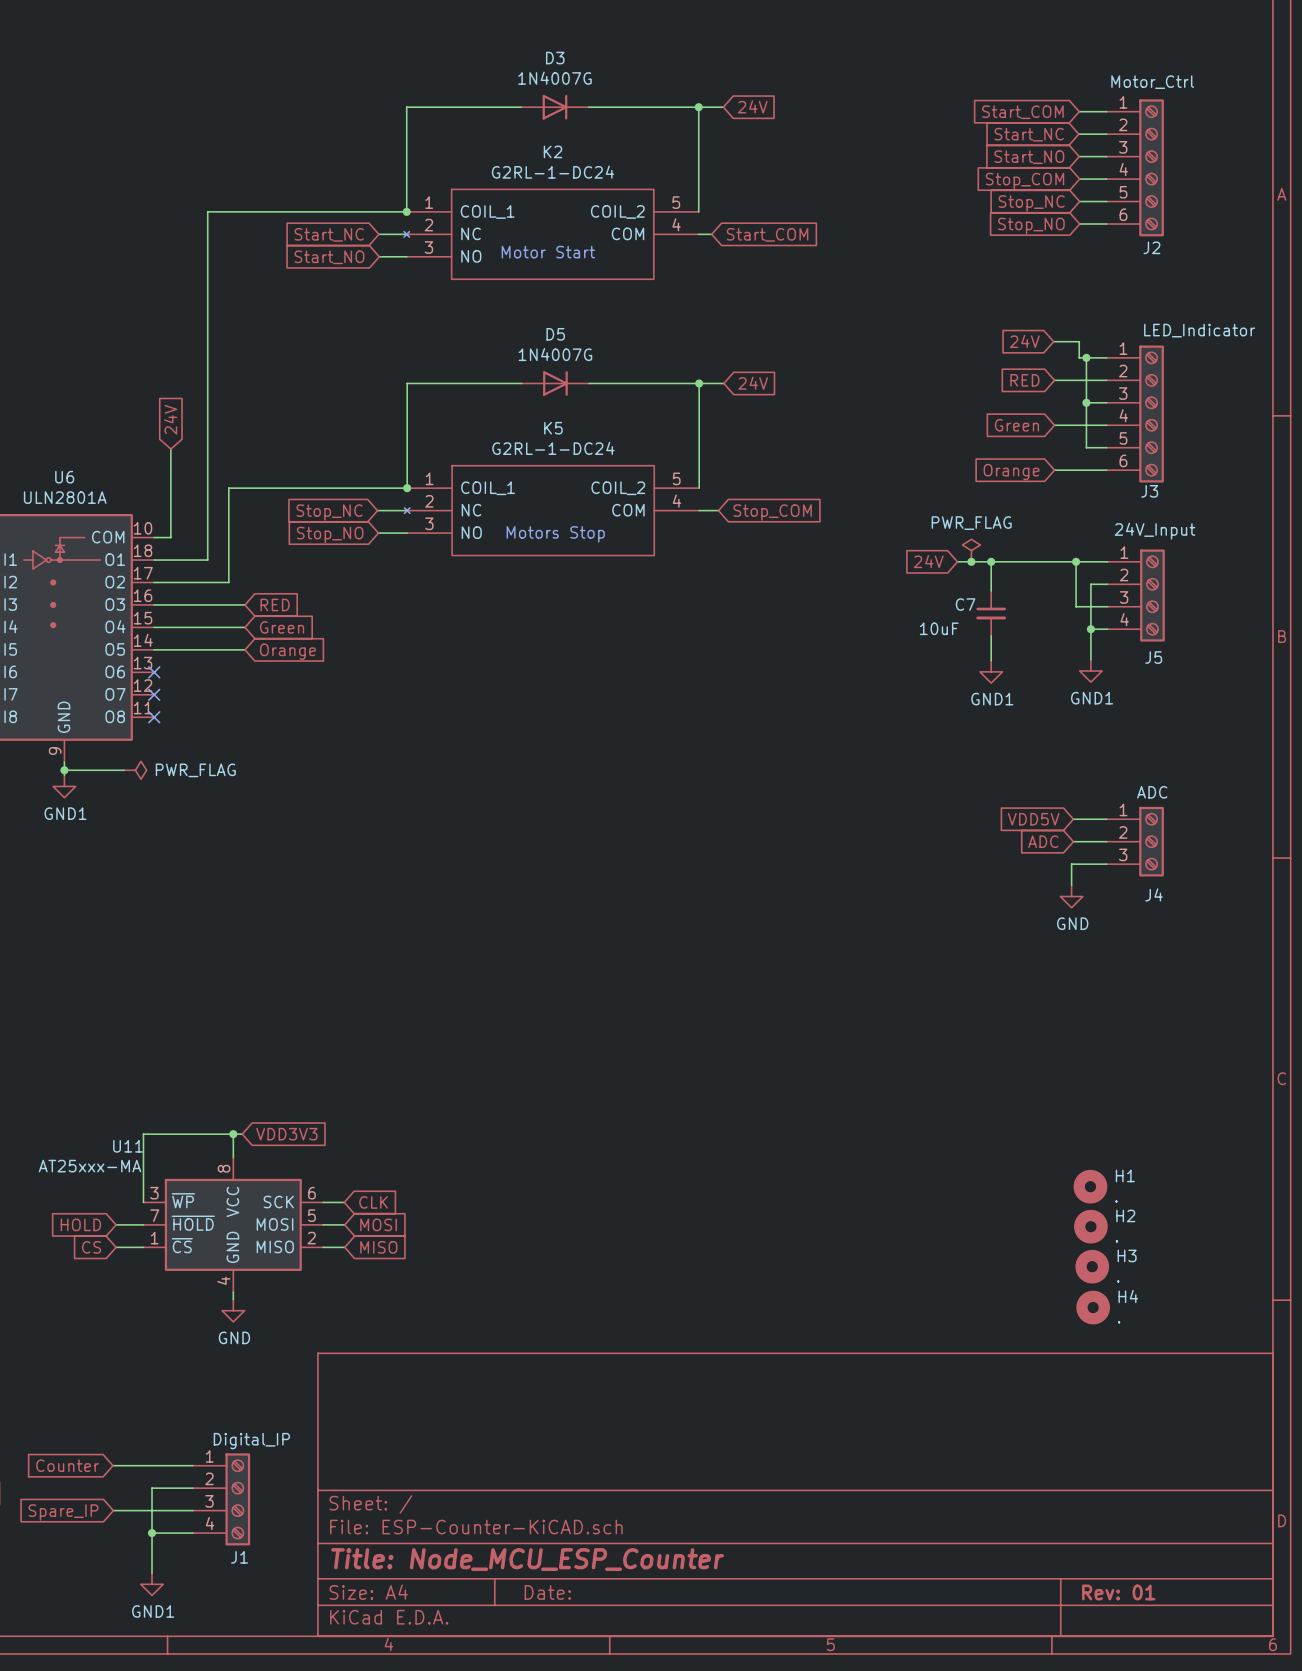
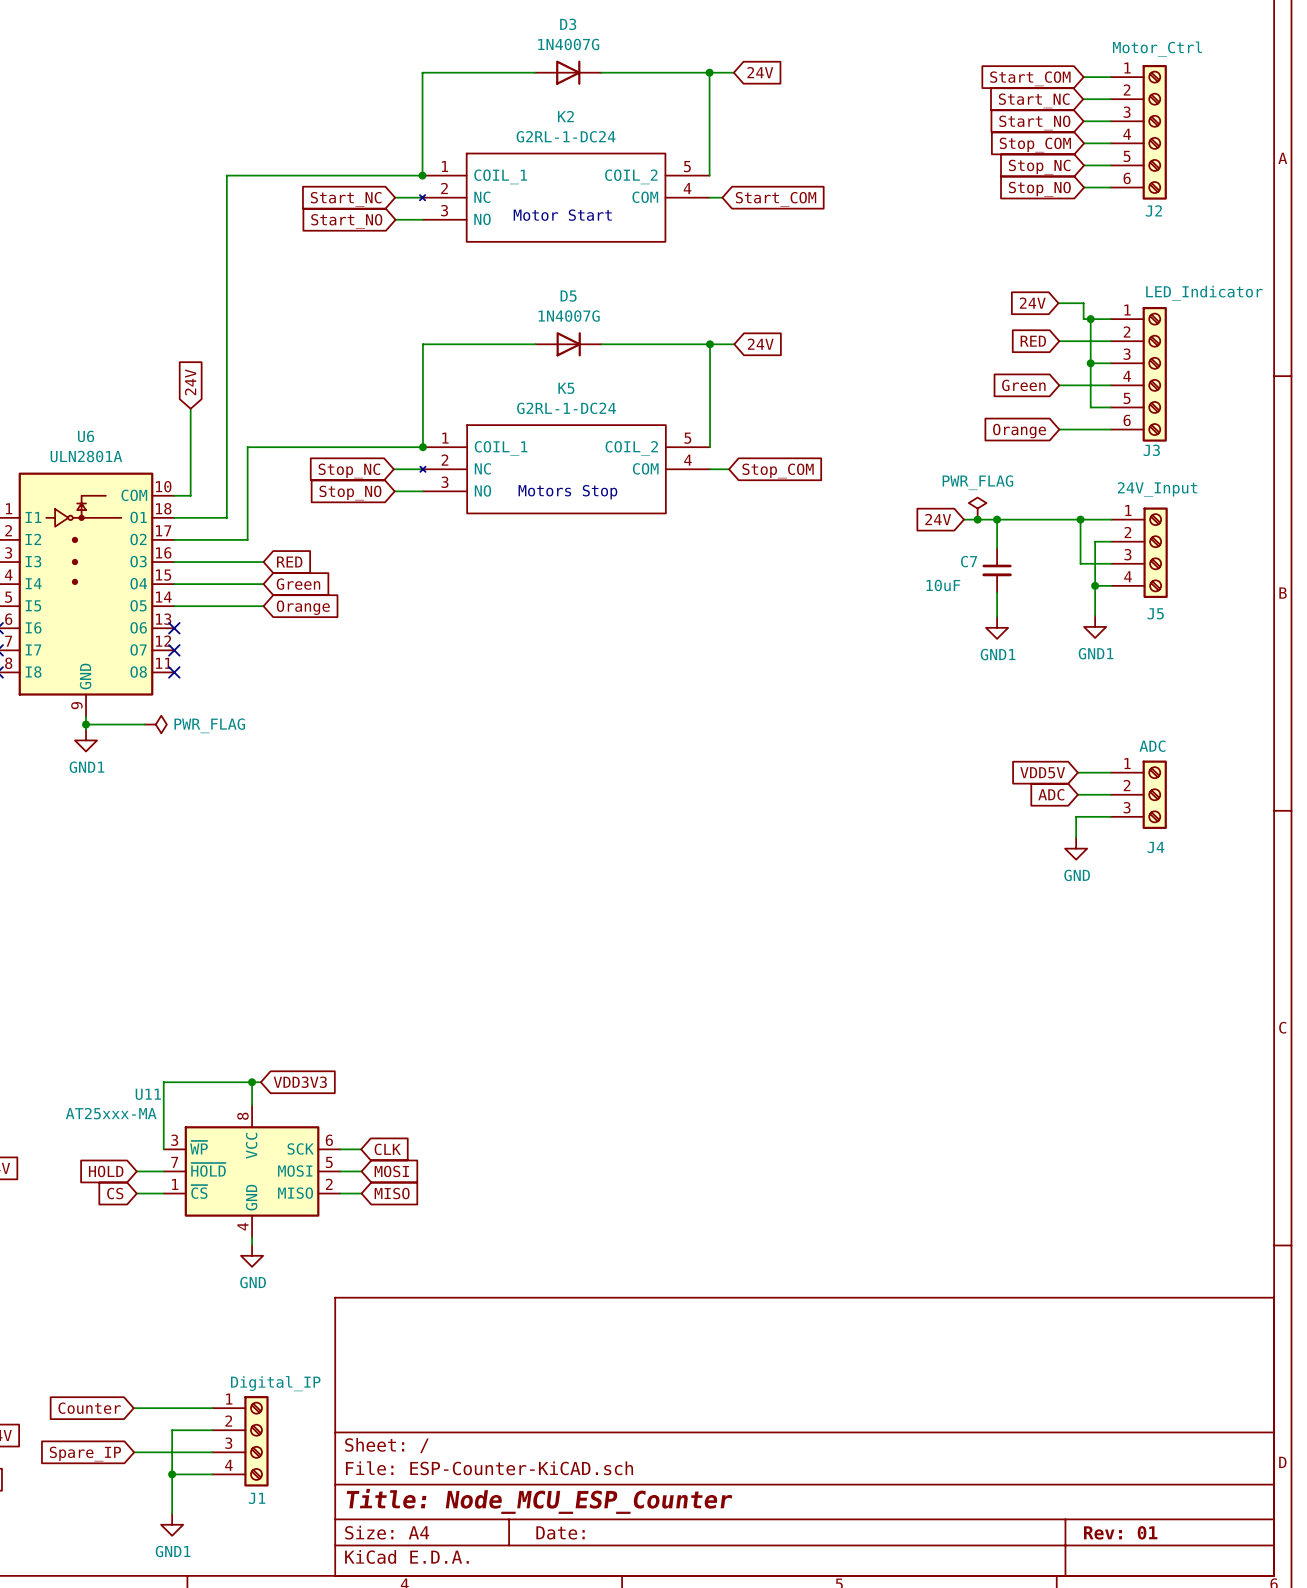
H1: . (1090, 1186) -> none
H2: . (1090, 1226) -> none
H3: . (1092, 1266) -> none
H4: . (1093, 1307) -> none

